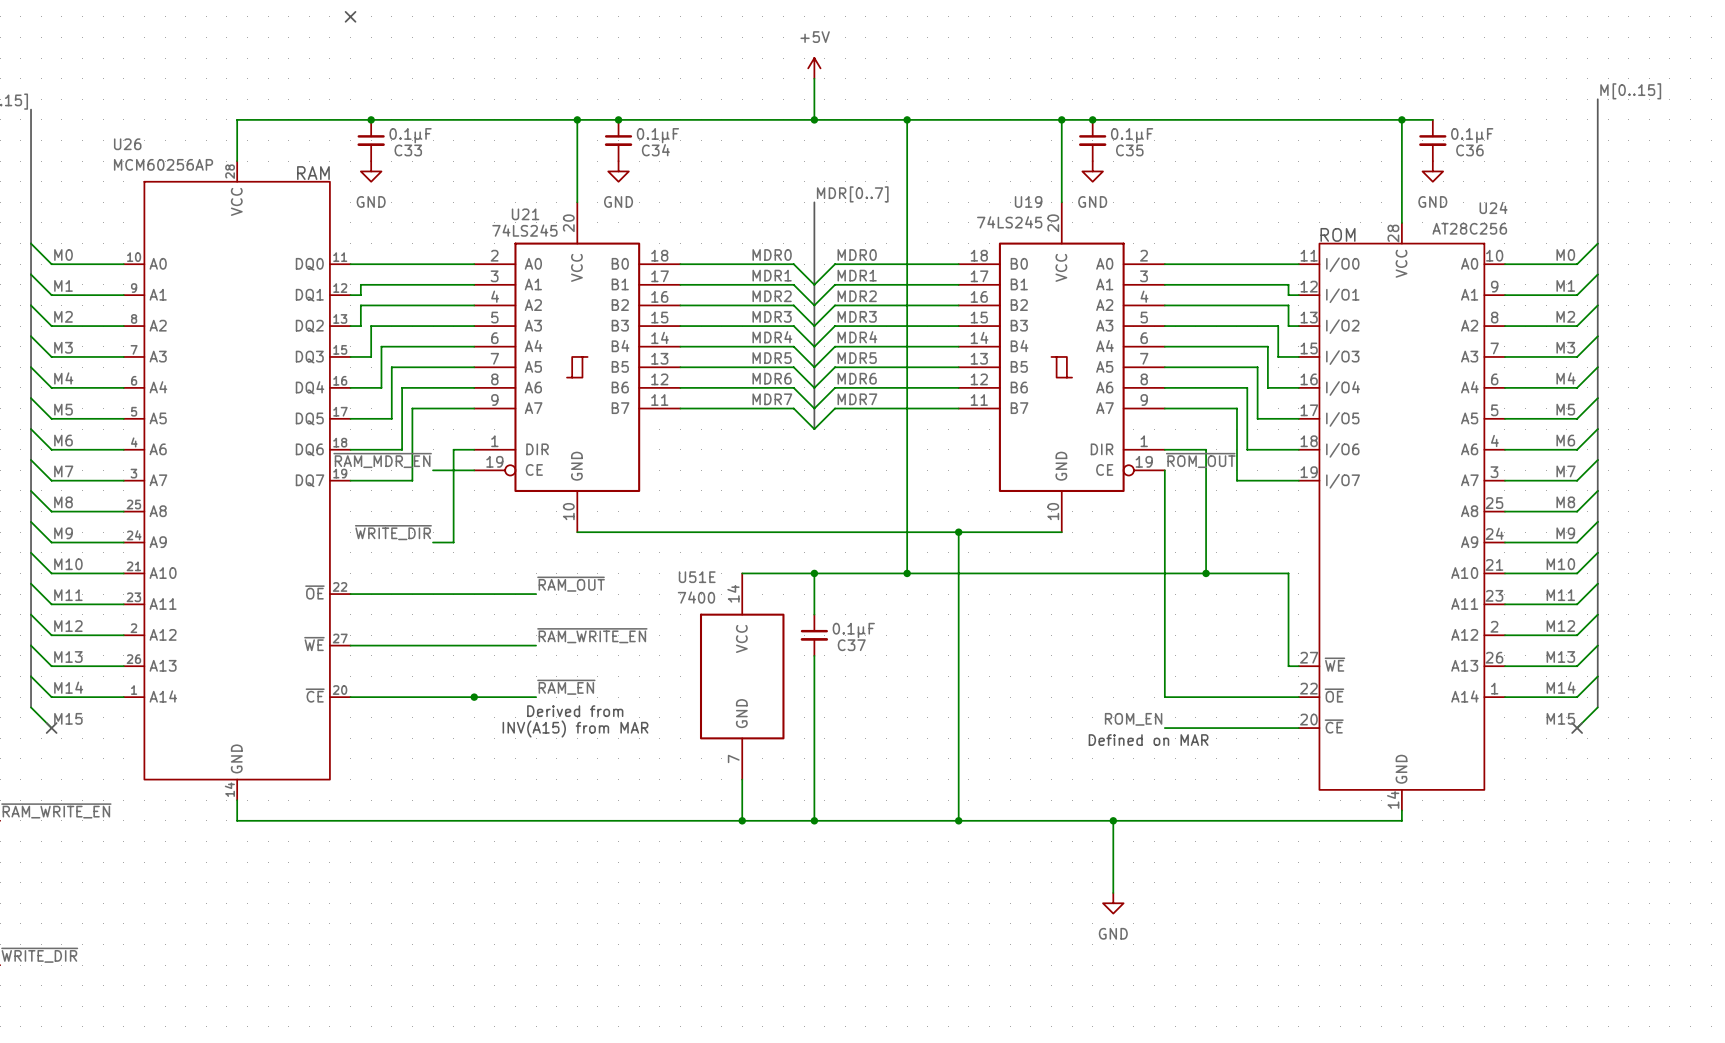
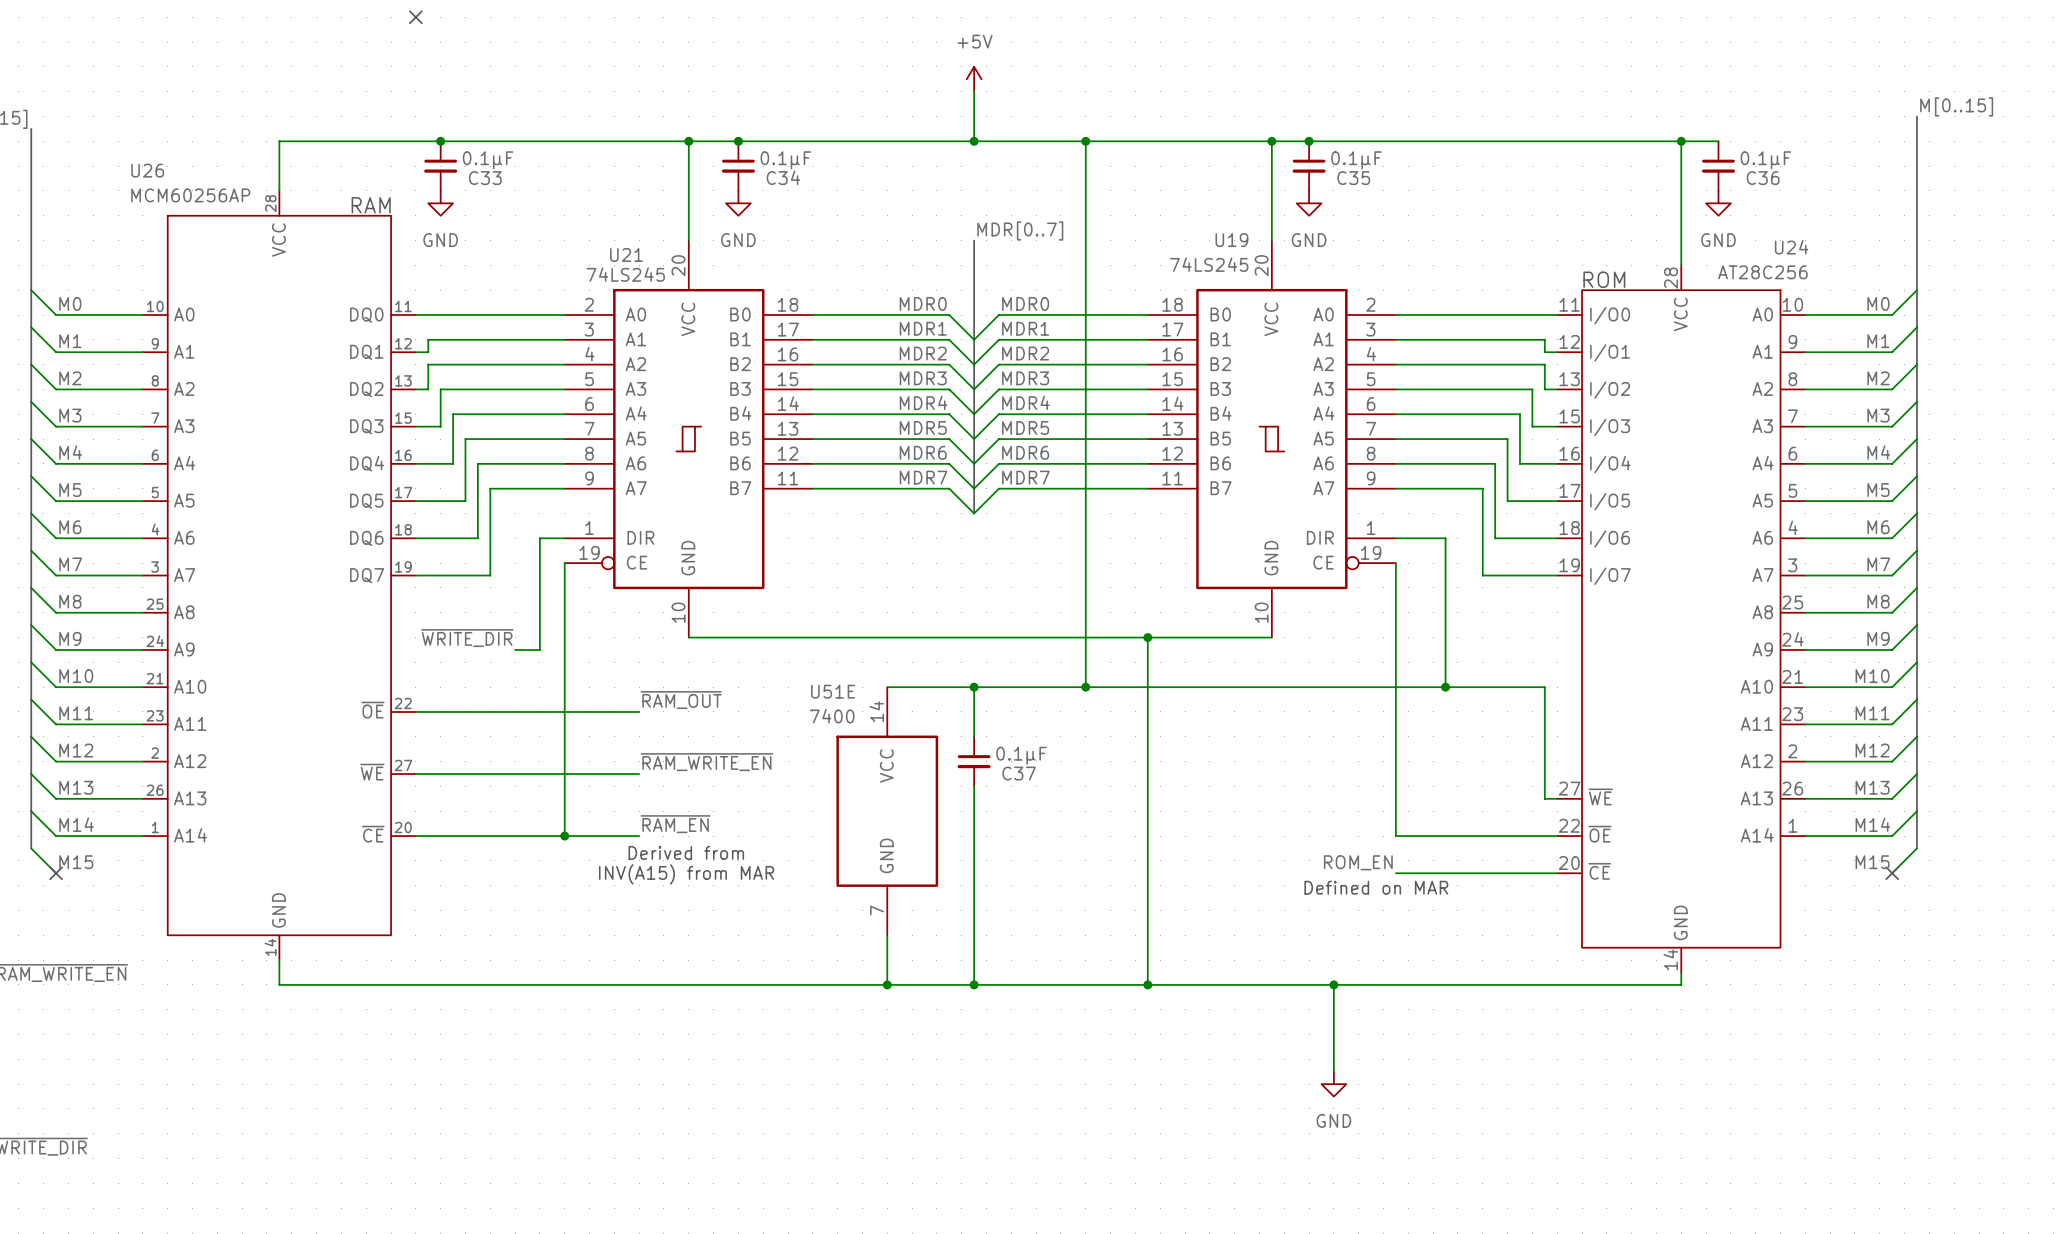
label: ~{RAM_MDR_EN} (382, 460) -> none
label: ~{ROM_OUT} (1200, 460) -> none
wire: (433, 470) (474, 470) -> (564, 836) (564, 563)

